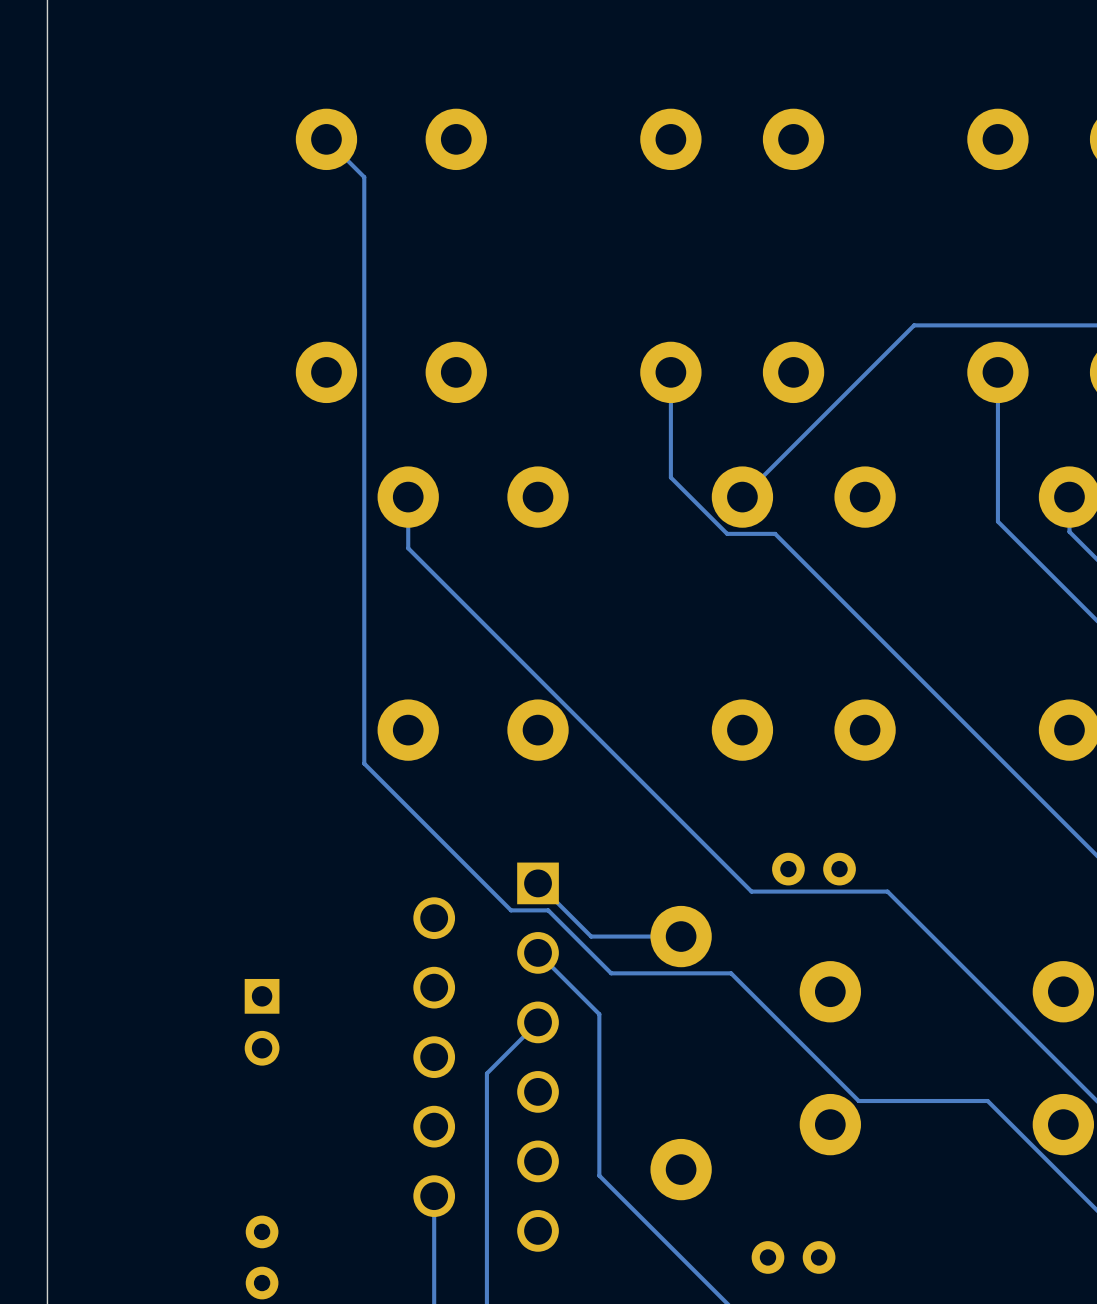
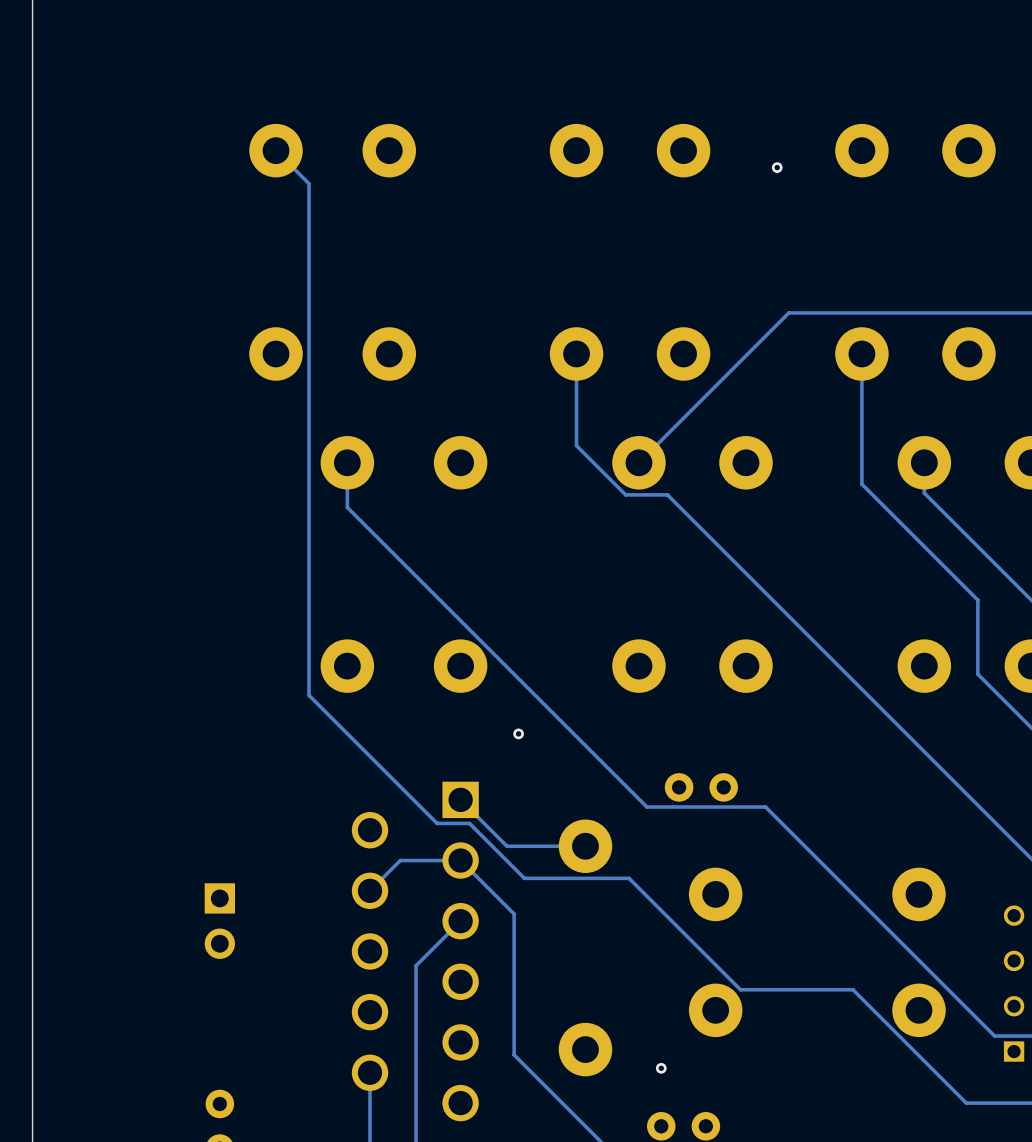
via: none -> (777, 167)
via: none -> (518, 733)
track: none -> (460, 860) (400, 860) (370, 890)
via: none -> (661, 1068)

